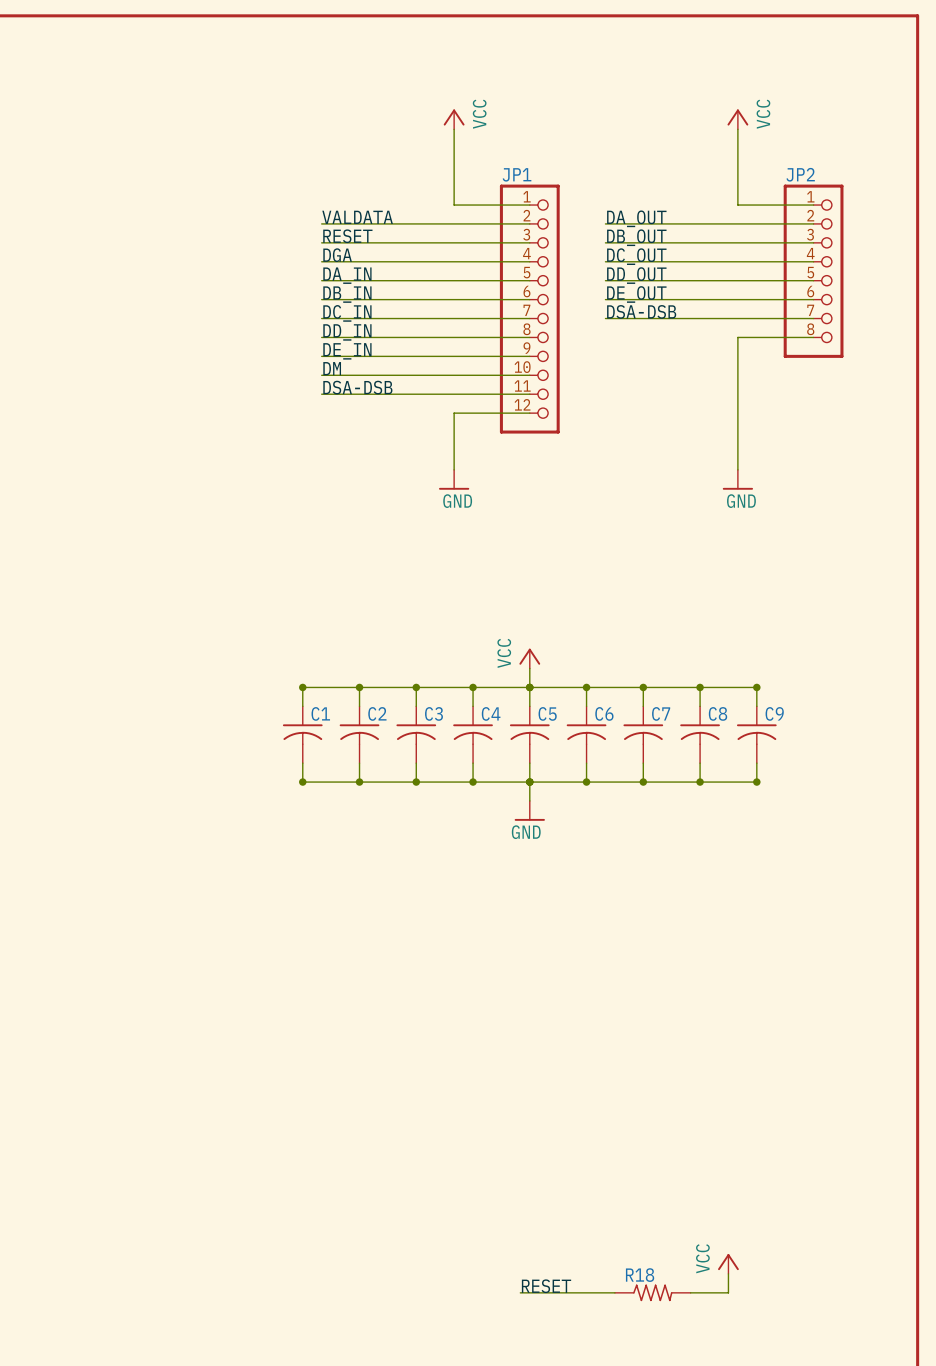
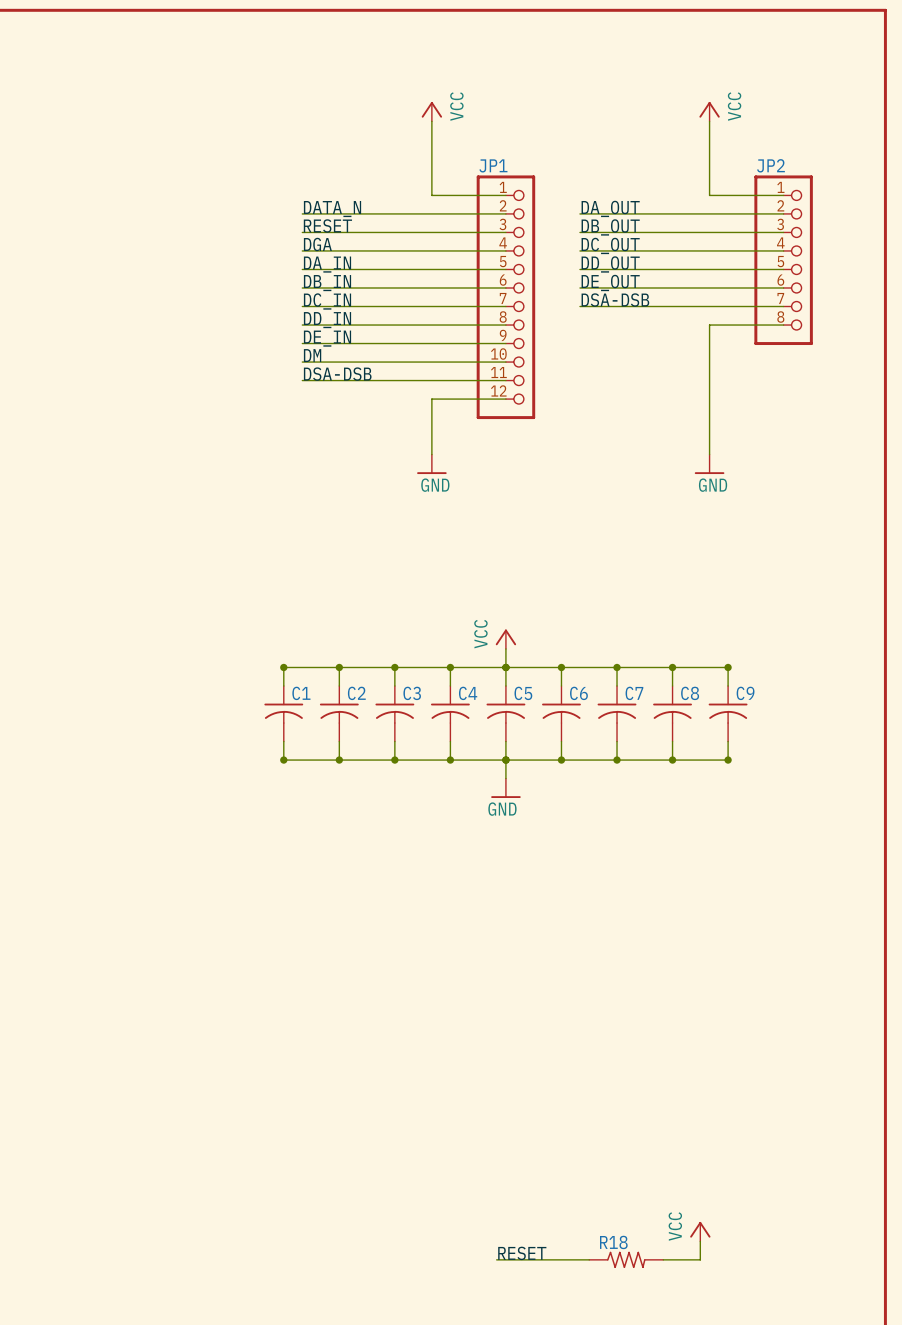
label: VALDATA (357, 217) -> DATA_N (332, 209)

